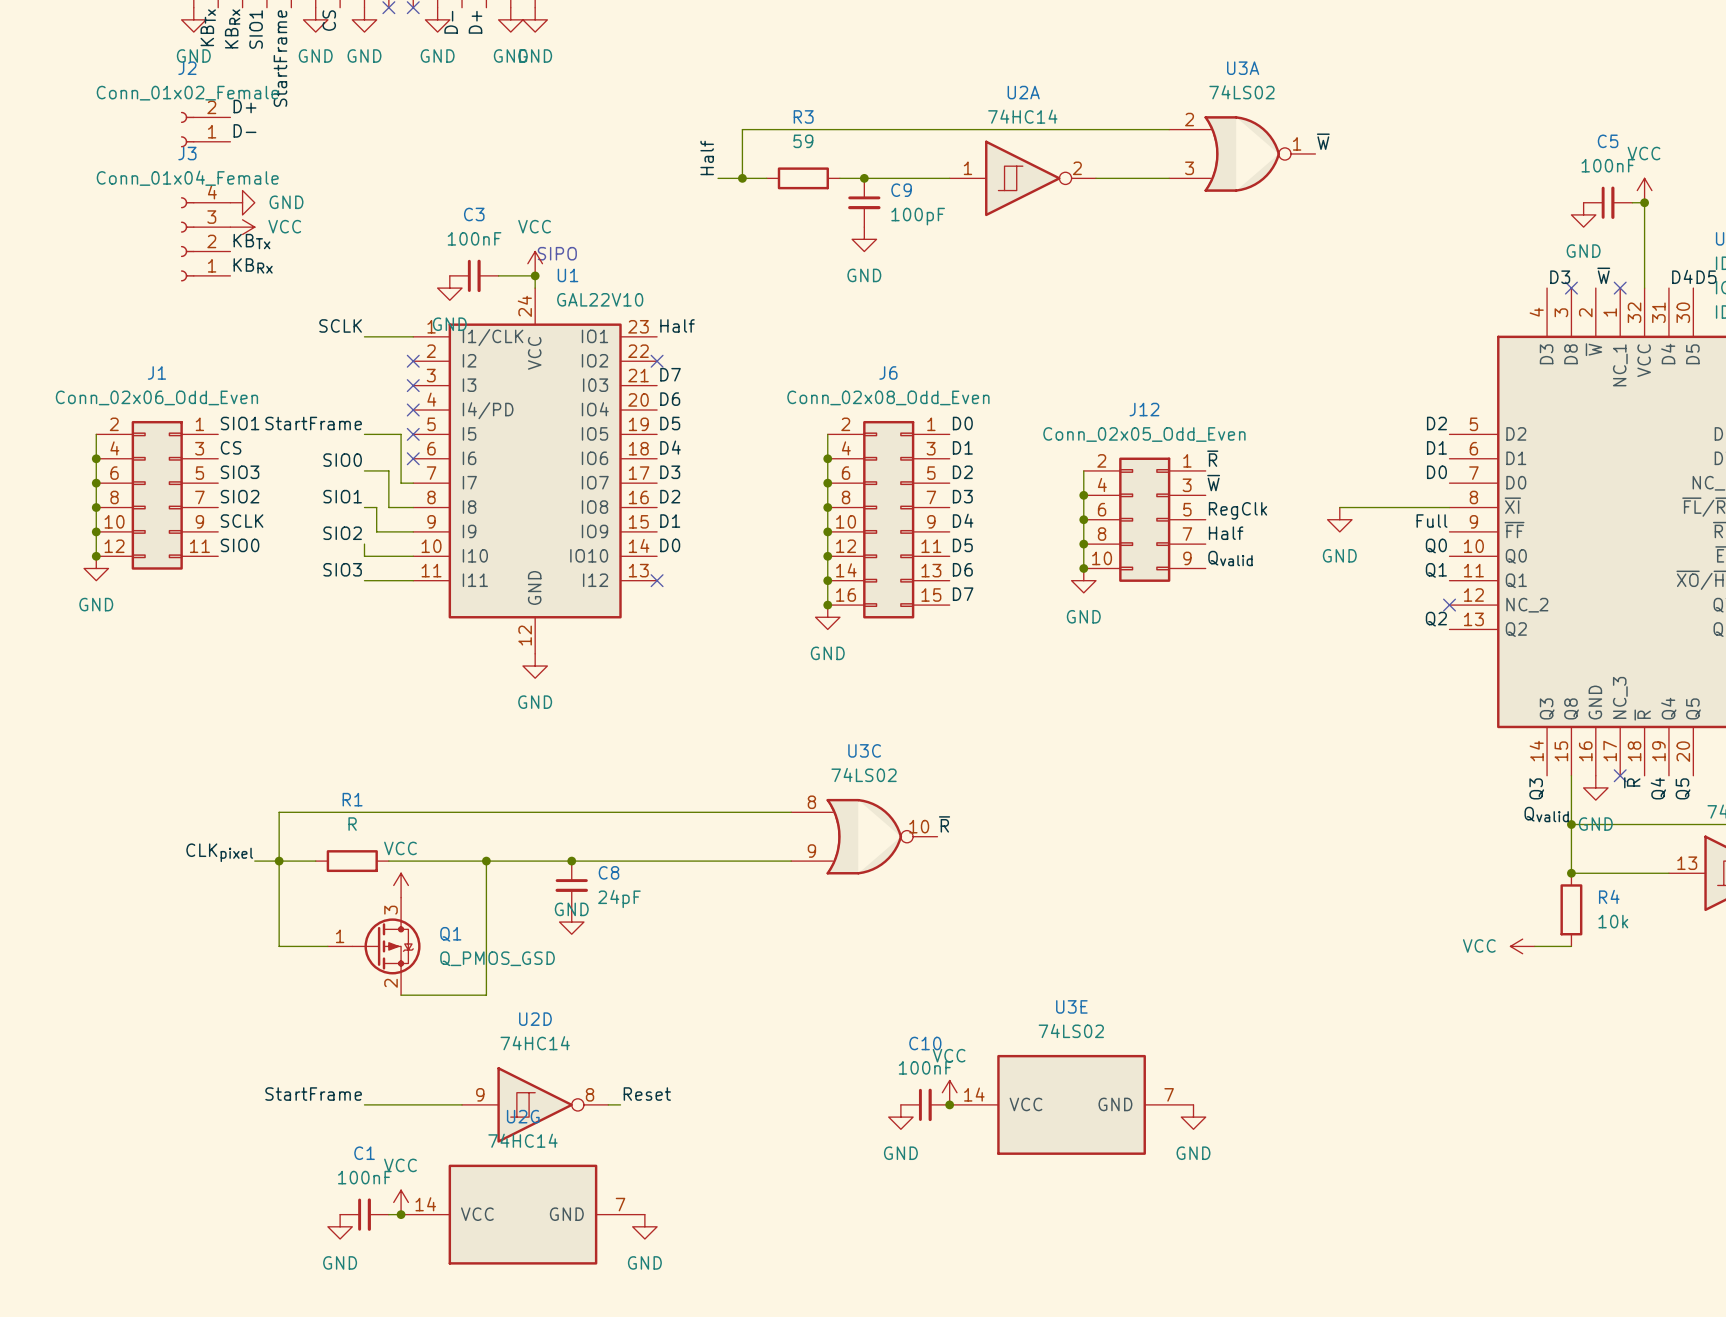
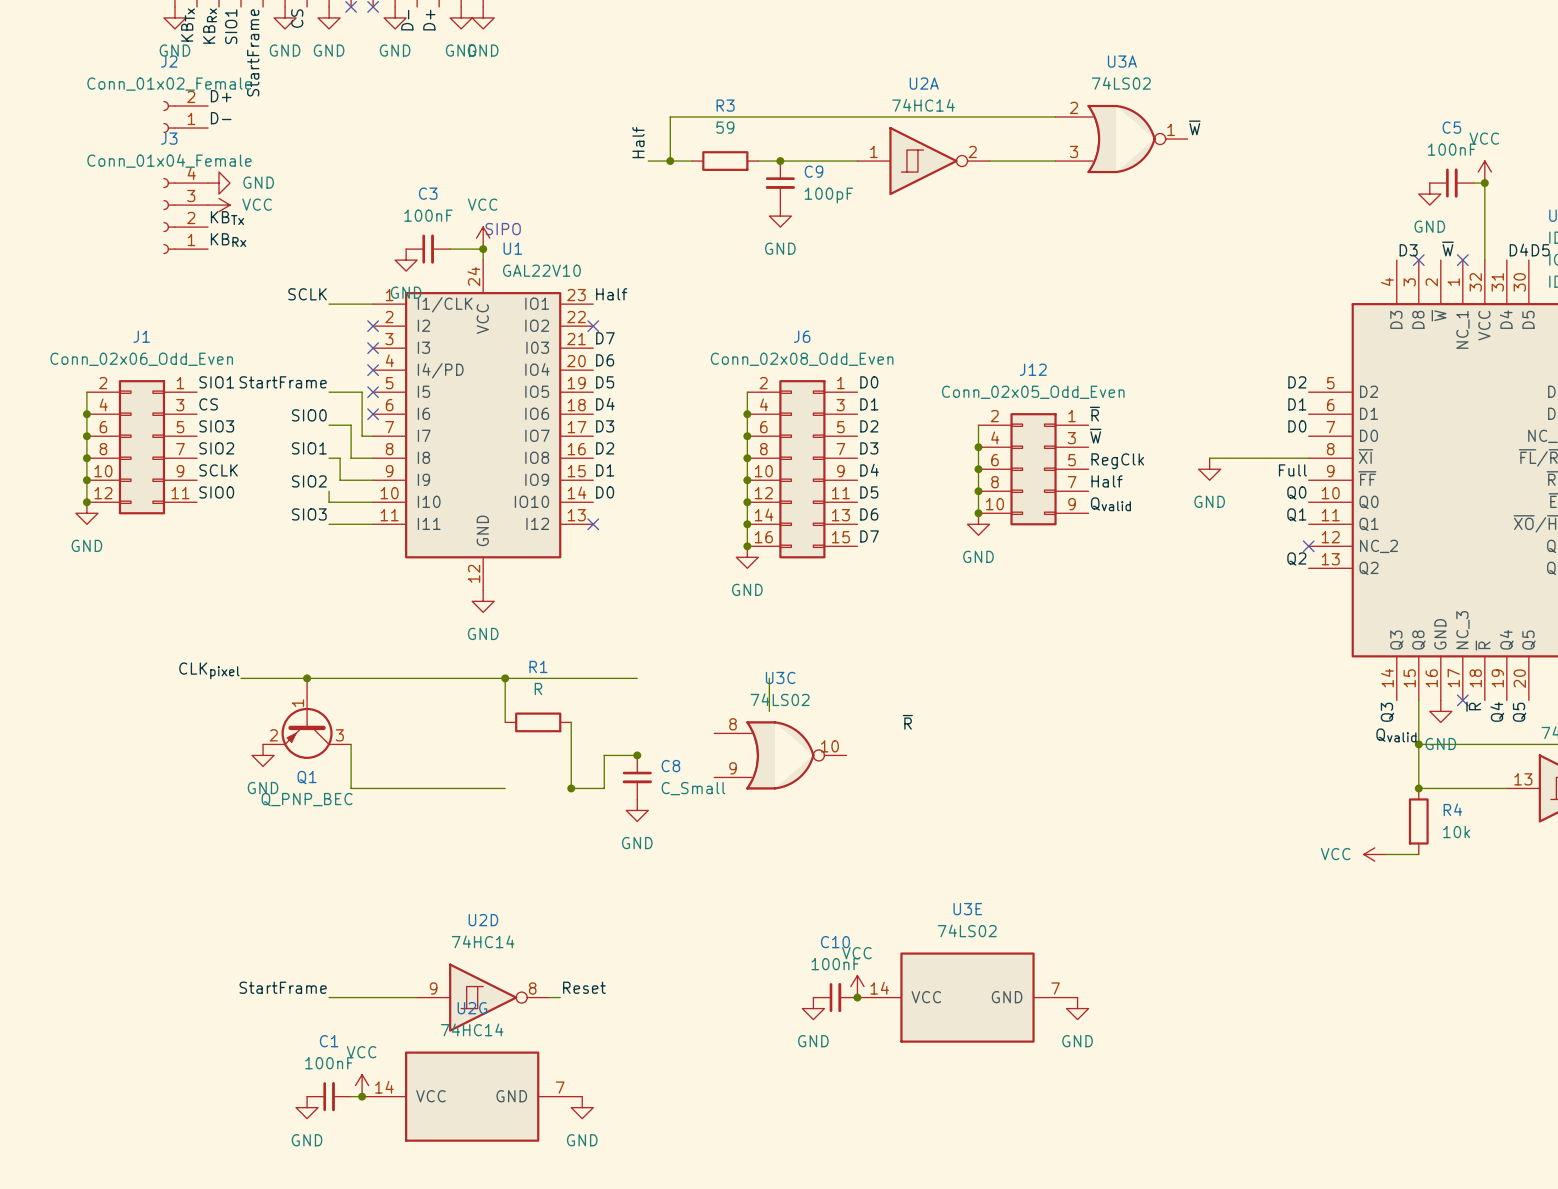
wire: none -> (241, 678) (637, 678)
junction: none -> (307, 678)
wire: none -> (505, 678) (505, 722)
junction: none -> (505, 678)
wire: none -> (769, 678) (769, 711)
wire: none -> (571, 722) (571, 788) (604, 788) (604, 755) (637, 755)
wire: (791, 812) (279, 812) (279, 946) (327, 946) -> none
wire: none -> (351, 744) (351, 788) (505, 788)
label position: ~{R} (944, 824) -> ~{R} (907, 722)
power symbol: none -> GND (263, 755)
junction: none -> (637, 755)
label position: CLKpixel (219, 852) -> CLKpixel (209, 670)
wire: (254, 861) (315, 861) -> none
junction: (279, 861) -> none
R1 position: (352, 861) -> (538, 722)
wire: (388, 861) (791, 861) -> none
wire: (486, 861) (486, 995) (401, 995) -> none
junction: (486, 861) -> none
junction: (571, 861) -> none
junction: none -> (571, 788)
power symbol: VCC (401, 885) -> none
C8 position: (571, 885) -> (637, 777)
Q1 symbol: [327, 897, 421, 996] -> [263, 678, 352, 759]
C8 value: 24pF (619, 899) -> C_Small (693, 788)
power symbol text position: GND (571, 909) -> GND (637, 843)
power symbol position: GND (571, 922) -> GND (637, 810)
Q1 name position: Q1 (450, 934) -> Q1 (307, 777)
Q1 value: Q_PMOS_GSD (497, 958) -> Q_PNP_BEC (307, 799)

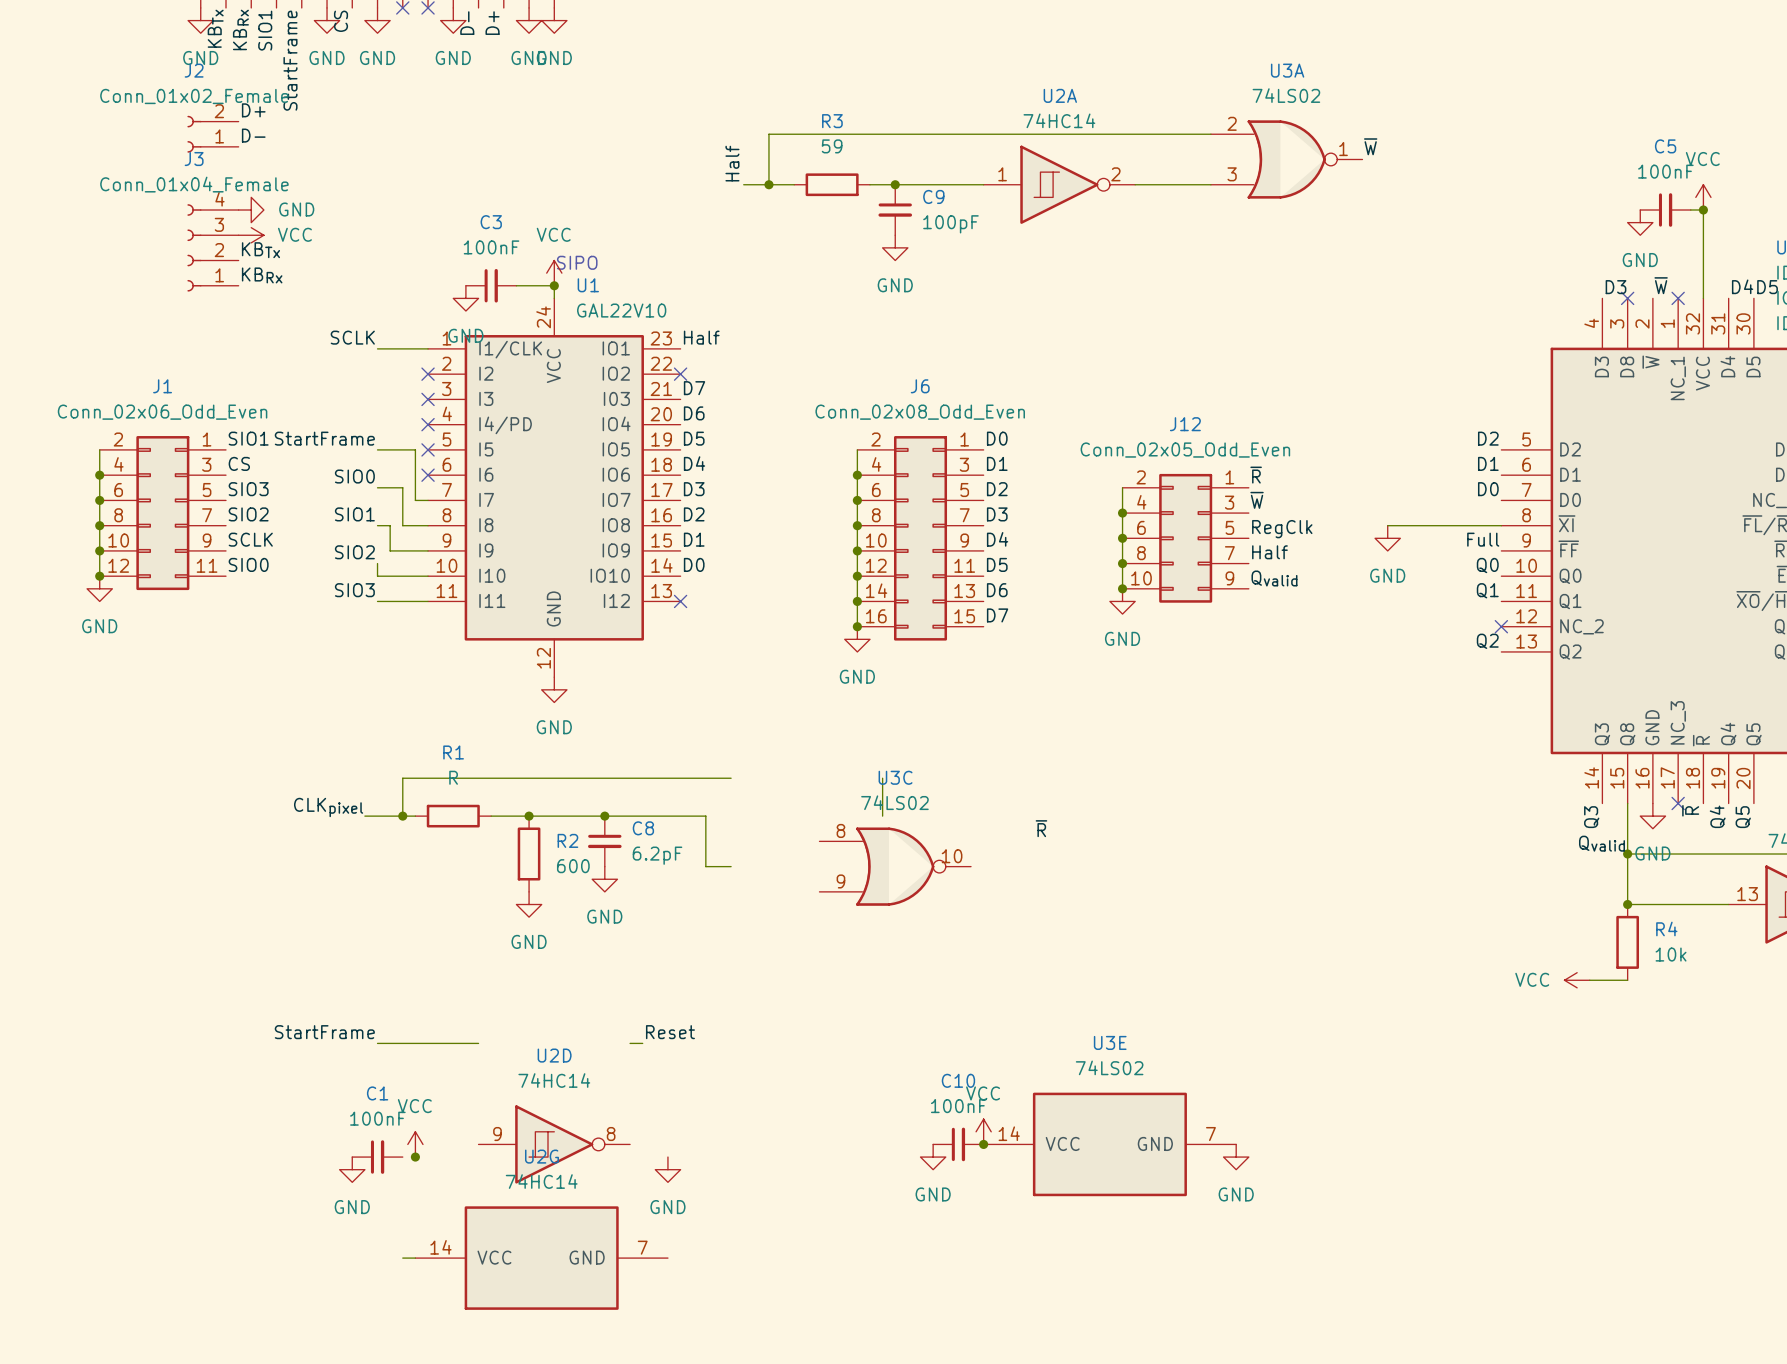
label position: CLKpixel (209, 670) -> CLKpixel (328, 807)
wire: (241, 678) (351, 678) -> (402, 816) (402, 778)
junction: (307, 678) -> none
wire: (505, 678) (505, 722) -> none
junction: (505, 678) -> none
wire: none -> (364, 816) (415, 816)
junction: none -> (402, 816)
junction: none -> (529, 816)
junction: none -> (604, 816)
Q1: Q_PNP_BEC (307, 718) -> none
R1 position: (538, 722) -> (453, 816)
wire: (571, 722) (571, 788) (604, 788) (604, 755) (615, 755) -> (491, 816) (705, 816) (705, 866)
wire: (351, 744) (351, 788) (505, 788) -> none
R2: none -> 600 (529, 854)
power symbol: GND (263, 755) -> none
junction: (637, 755) -> none
power symbol: none -> GND (604, 879)
C8 position: (637, 777) -> (604, 841)
power symbol: none -> GND (529, 904)
junction: (571, 788) -> none
C8 value: C_Small (693, 788) -> 6.2pF (657, 855)
power symbol: GND (637, 810) -> none
label position: StartFrame (283, 987) -> StartFrame (324, 1032)
label position: Reset (584, 987) -> Reset (670, 1032)
wire: (329, 997) (417, 997) -> (377, 1043) (478, 1043)
wire: (549, 997) (560, 997) -> (630, 1043) (642, 1043)
junction: none -> (415, 1157)
power symbol position: VCC (362, 1085) -> VCC (415, 1144)
C1 position: (329, 1096) -> (377, 1157)
junction: (362, 1096) -> none
power symbol position: GND (307, 1107) -> GND (352, 1169)
power symbol position: GND (582, 1107) -> GND (667, 1169)

